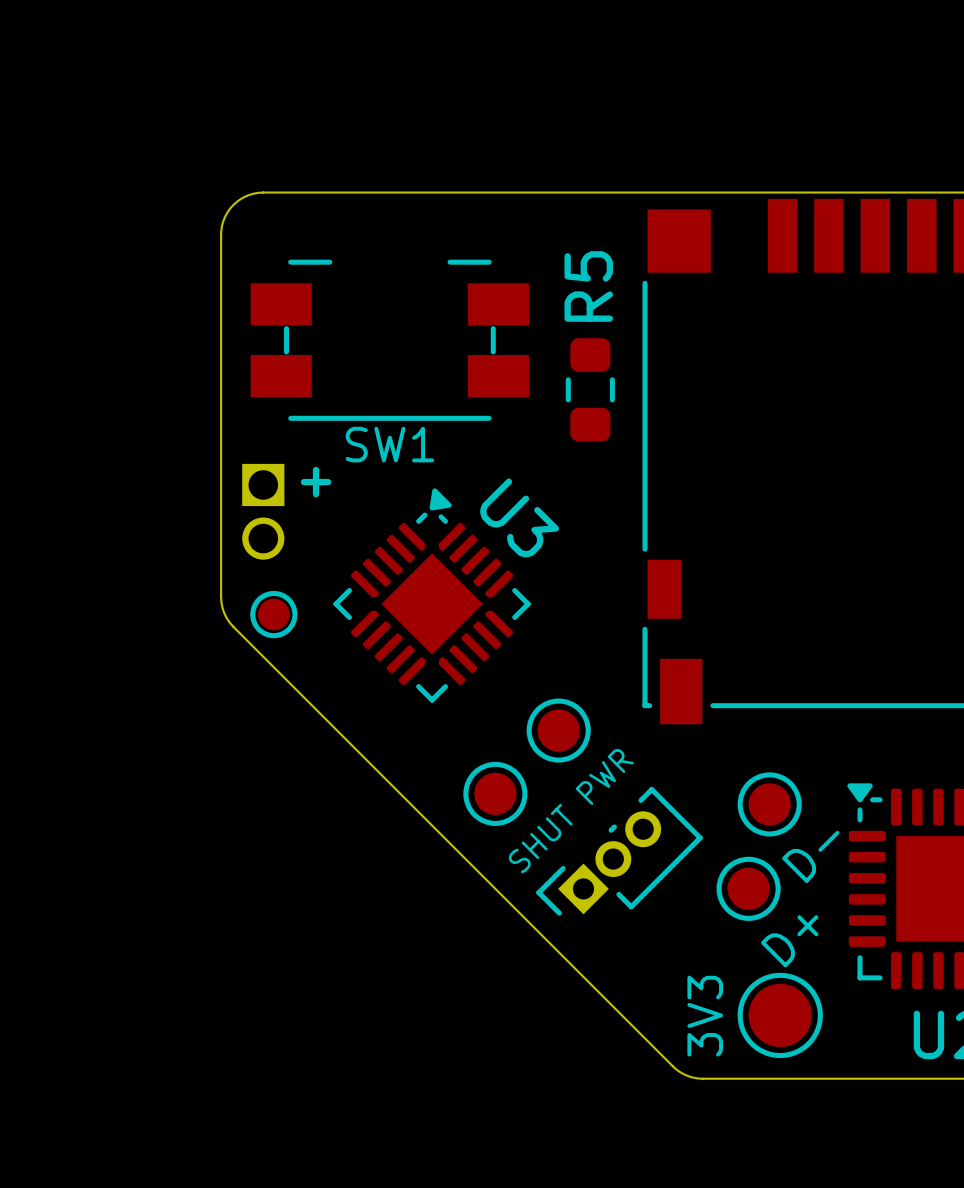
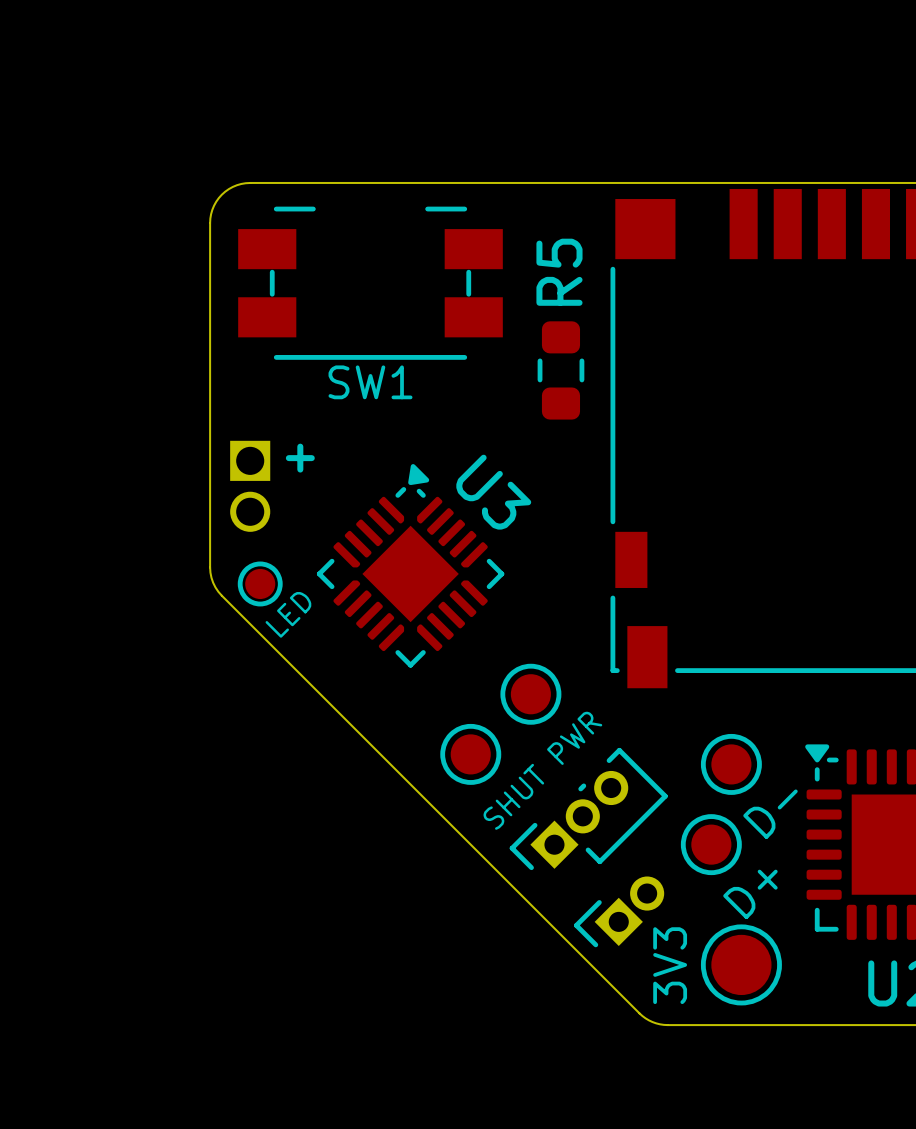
SW1 position: (389, 340) -> (370, 283)
text: none -> LED (288, 614)
part: none -> (619, 911)

